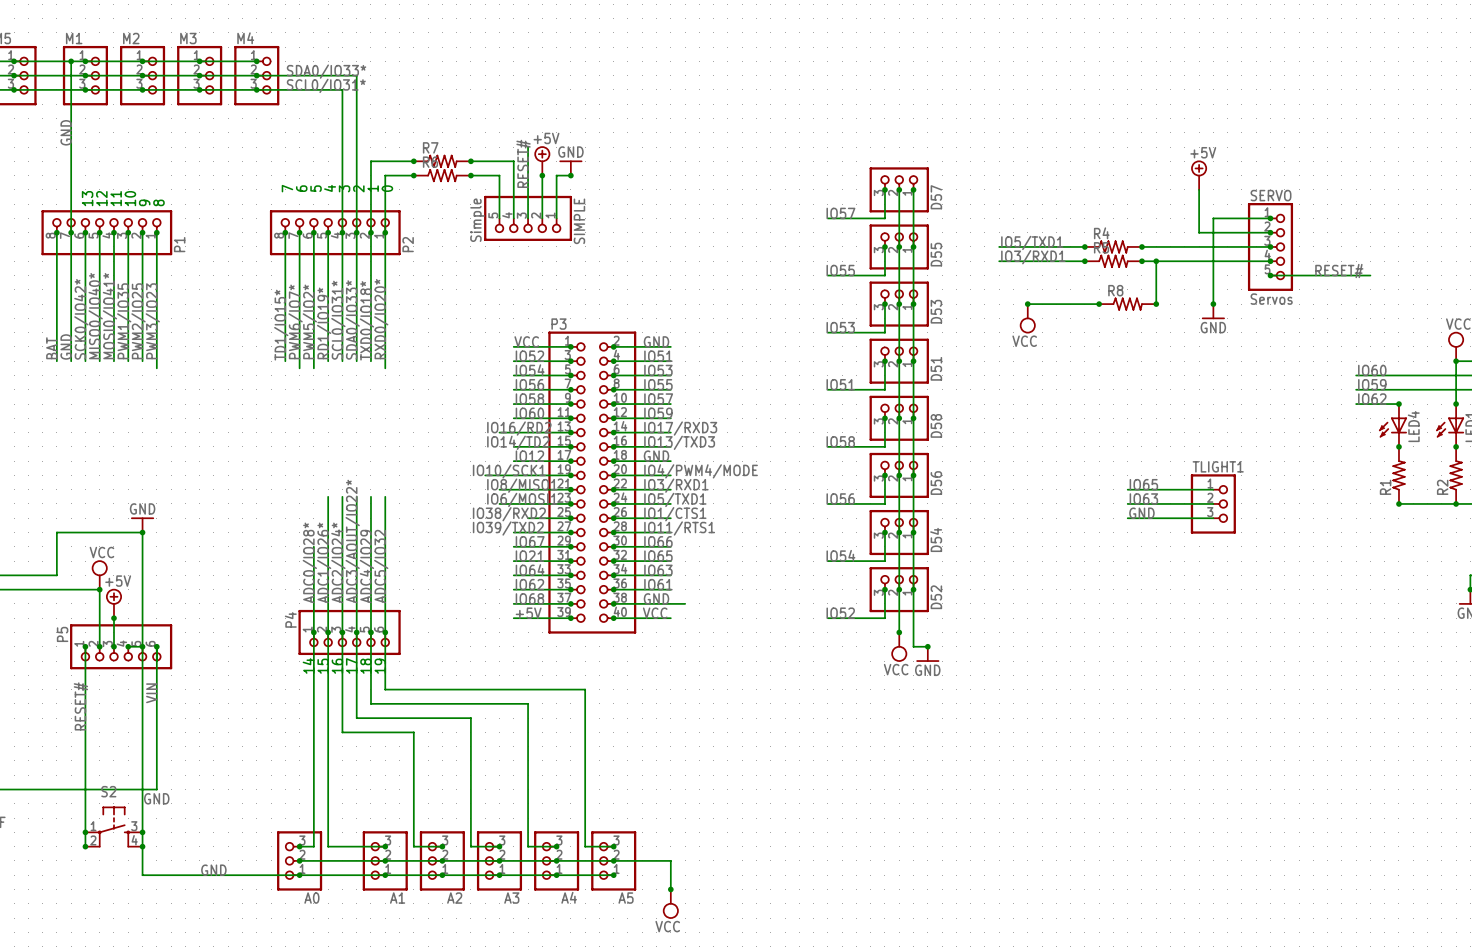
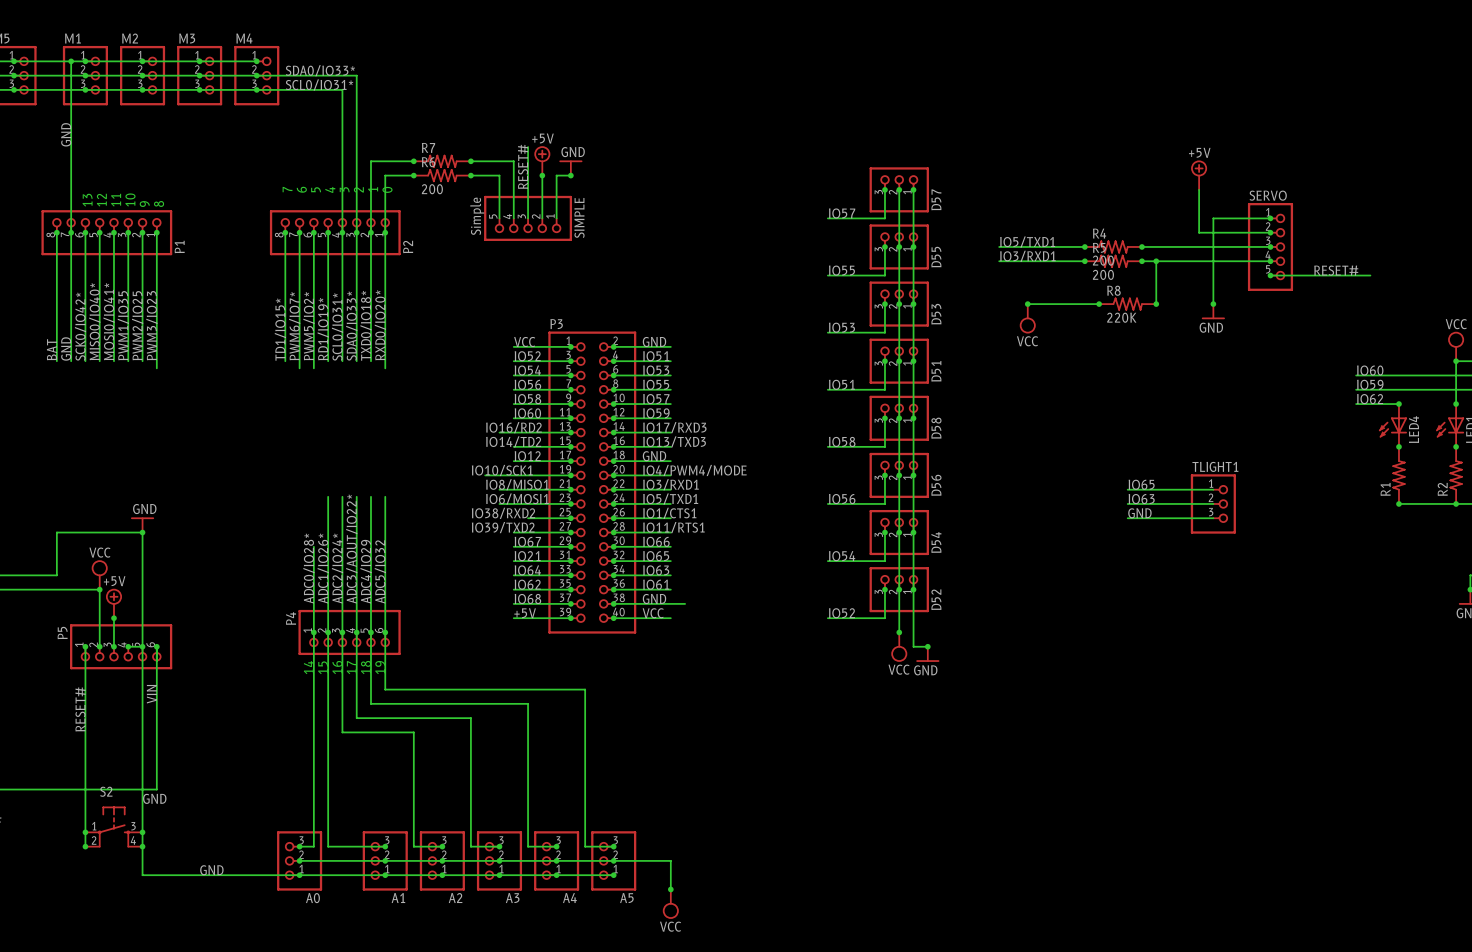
R6 value: none -> 200 (432, 189)
R4 value: none -> 200 (1103, 260)
R5 value: none -> 200 (1103, 274)
SERVO value: Servos (1271, 299) -> none
R8 value: none -> 220K (1121, 317)

